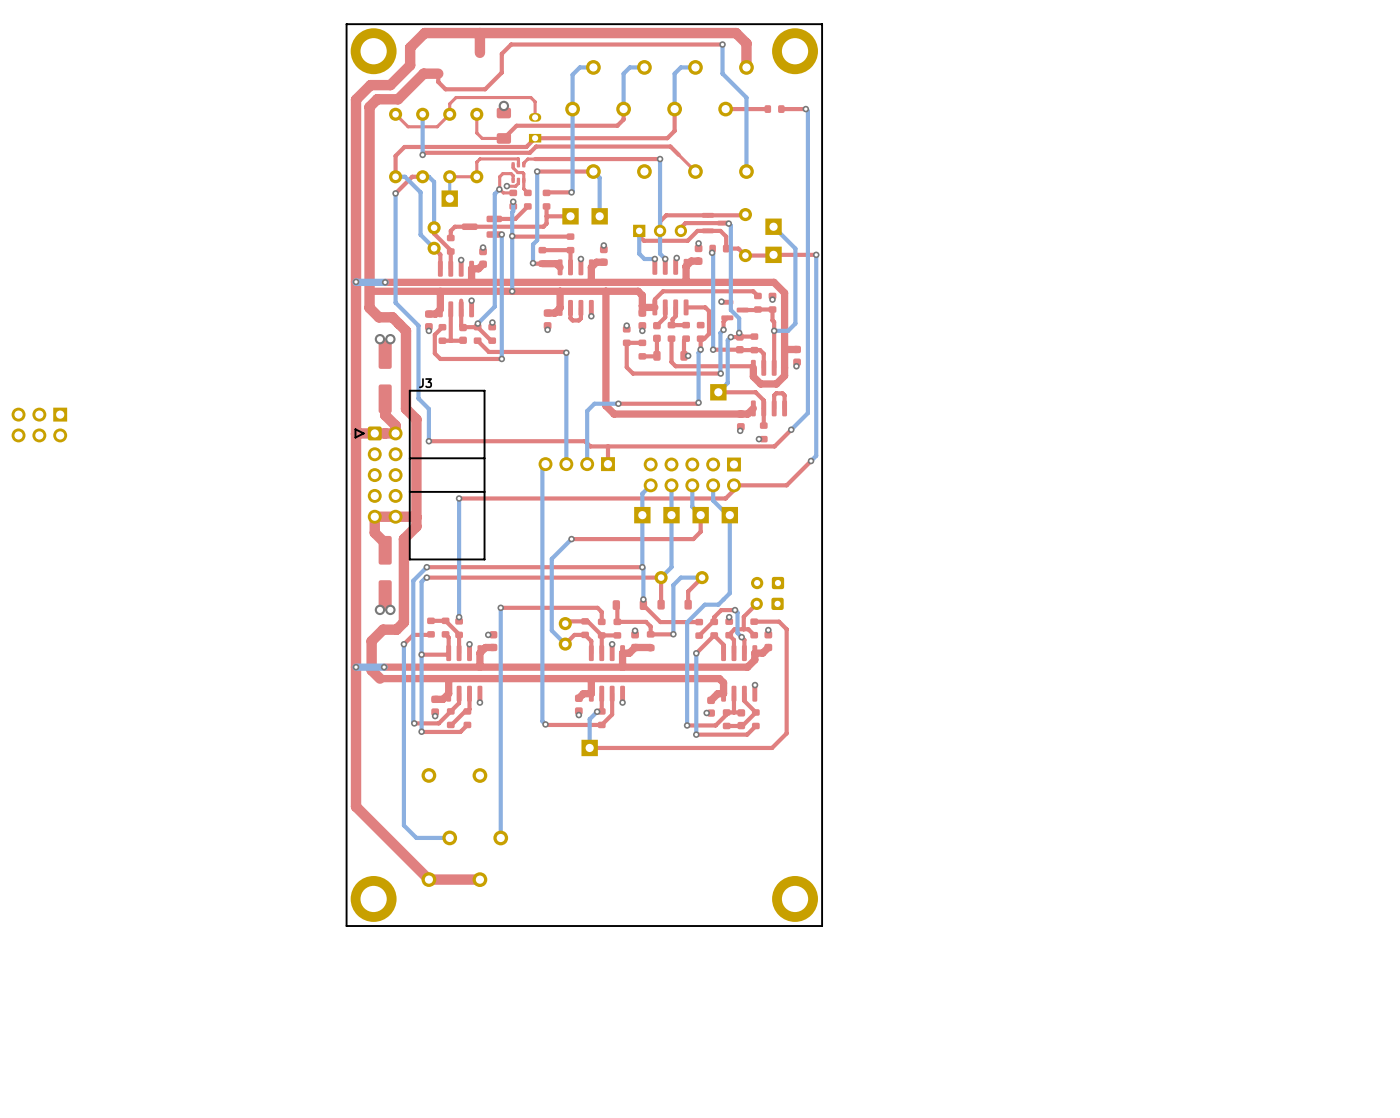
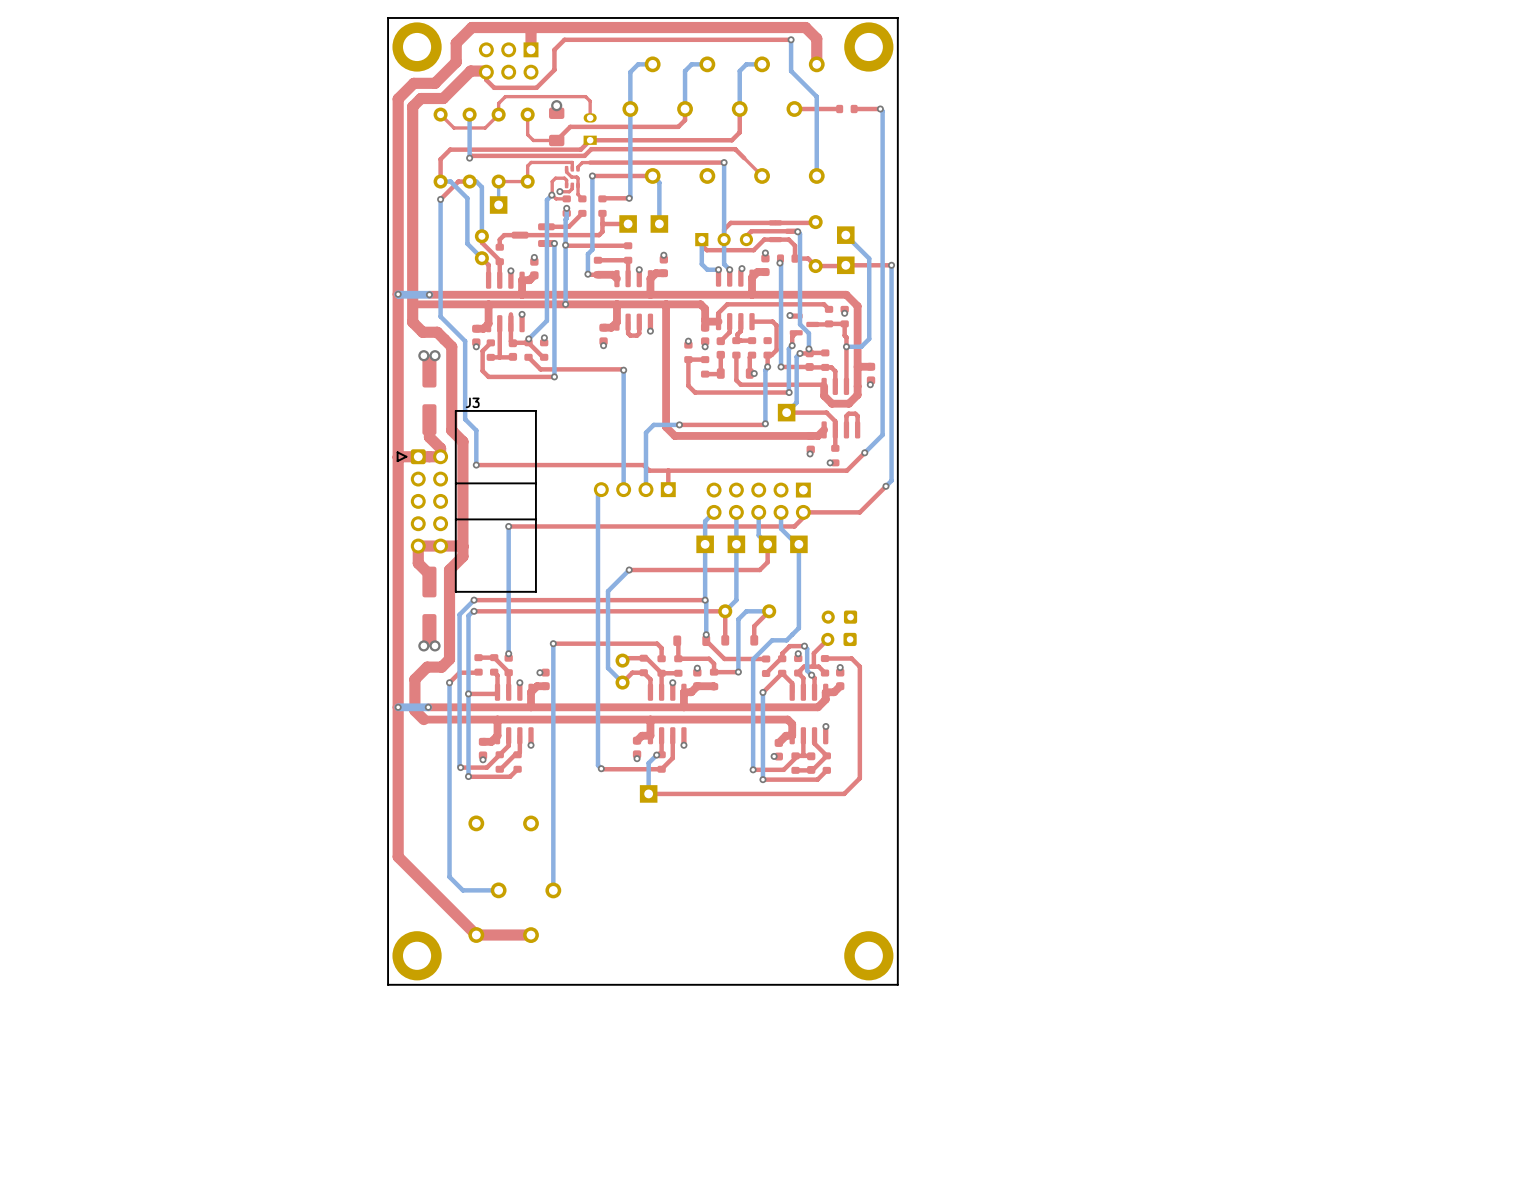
part: none -> (508, 61)
part: (39, 425) -> none

